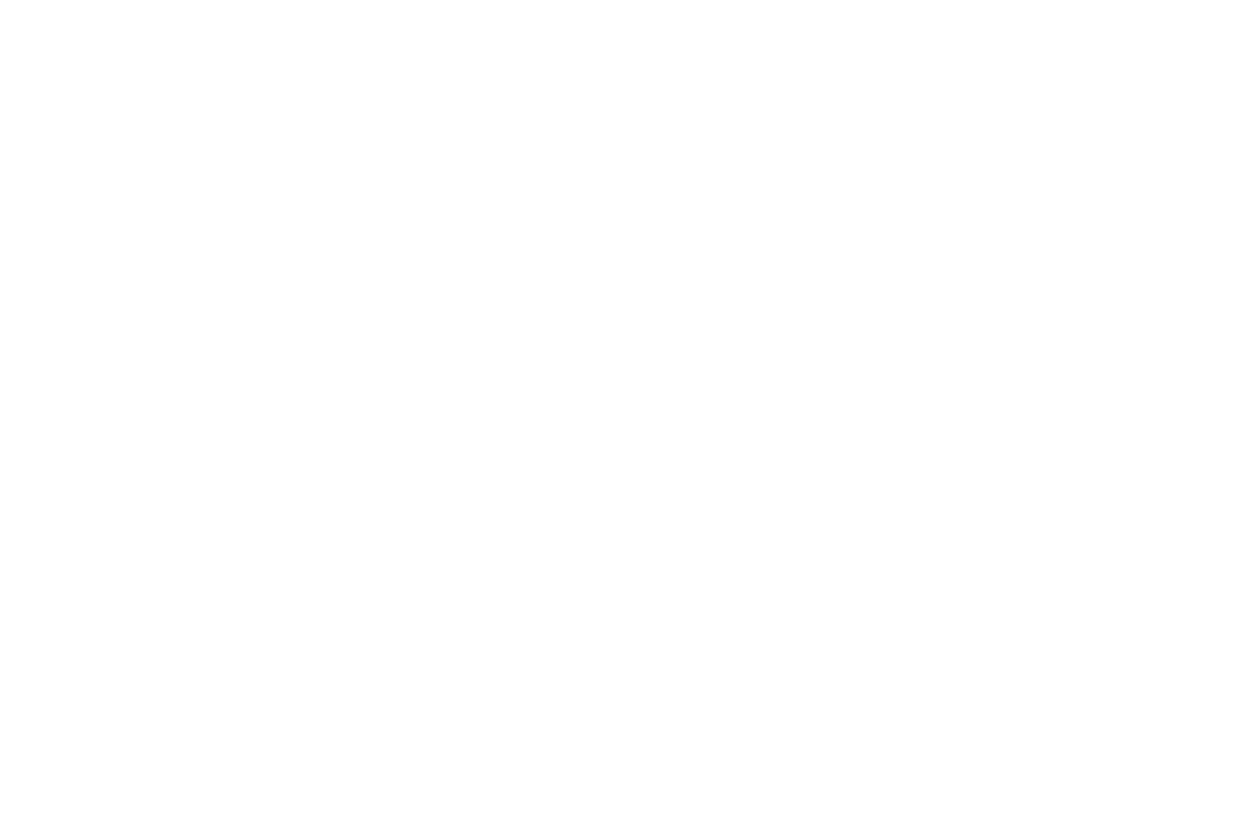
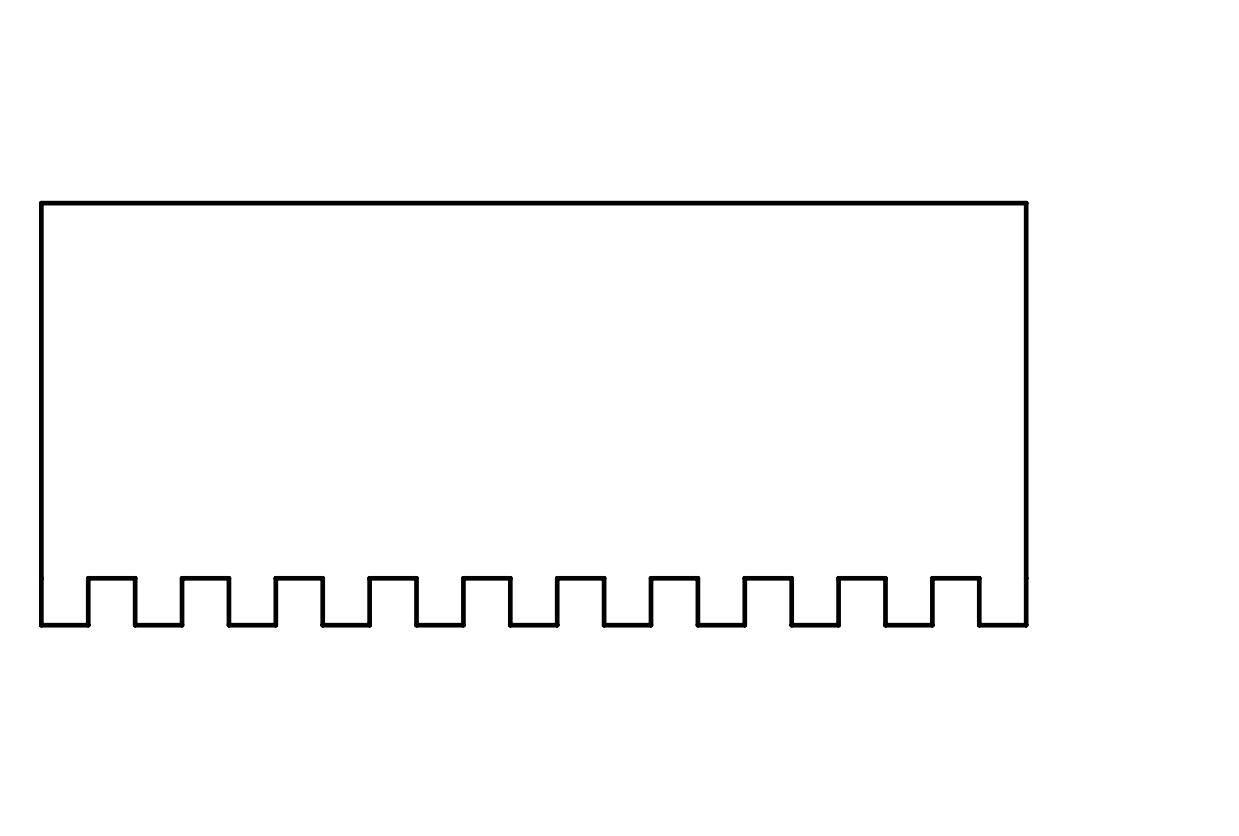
board edge: none -> (1026, 203) (1026, 625) (979, 625) (979, 578) (932, 578) (932, 625) (885, 625) (885, 578) (838, 578) (838, 625) (791, 625) (791, 578) (744, 578) (744, 625) (697, 625) (697, 578) (651, 578) (651, 625) (604, 625) (604, 578) (557, 578) (557, 625) (510, 625) (510, 578) (463, 578) (463, 625) (416, 625) (416, 578) (369, 578) (369, 625) (322, 625) (322, 578) (275, 578) (275, 625) (228, 625) (228, 578) (182, 578) (182, 625) (135, 625) (135, 578) (88, 578) (88, 625) (41, 625) (41, 203) (1026, 203)

